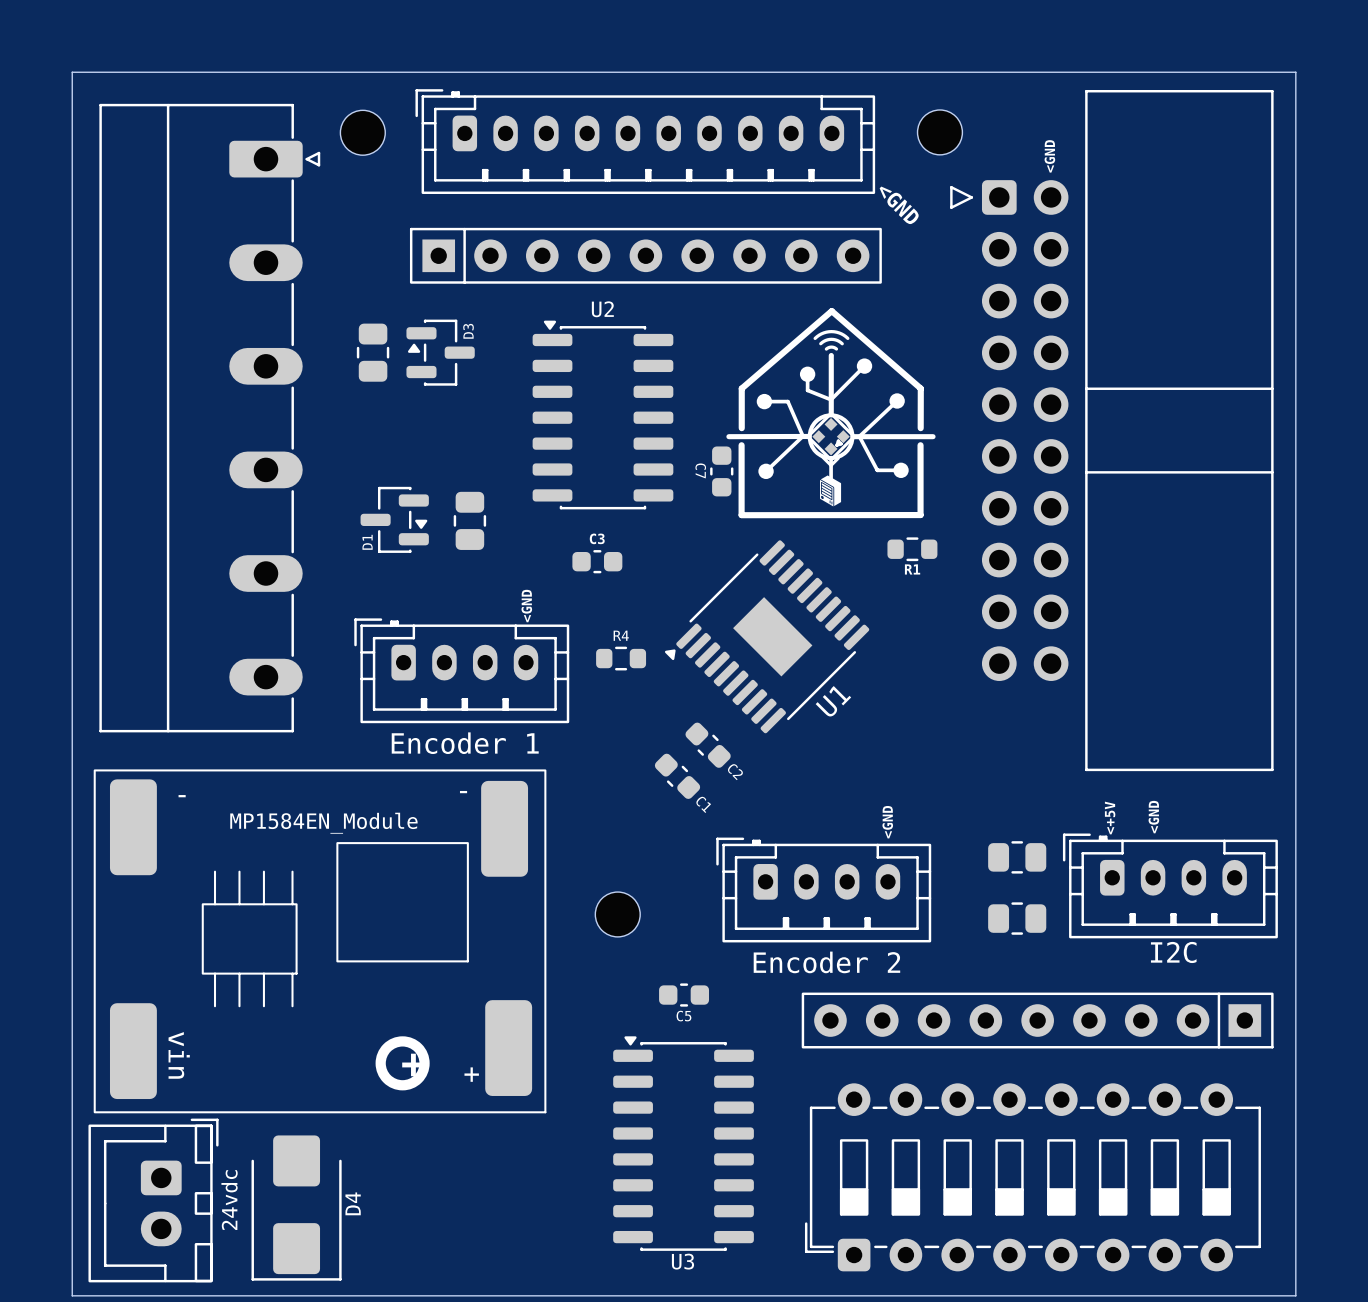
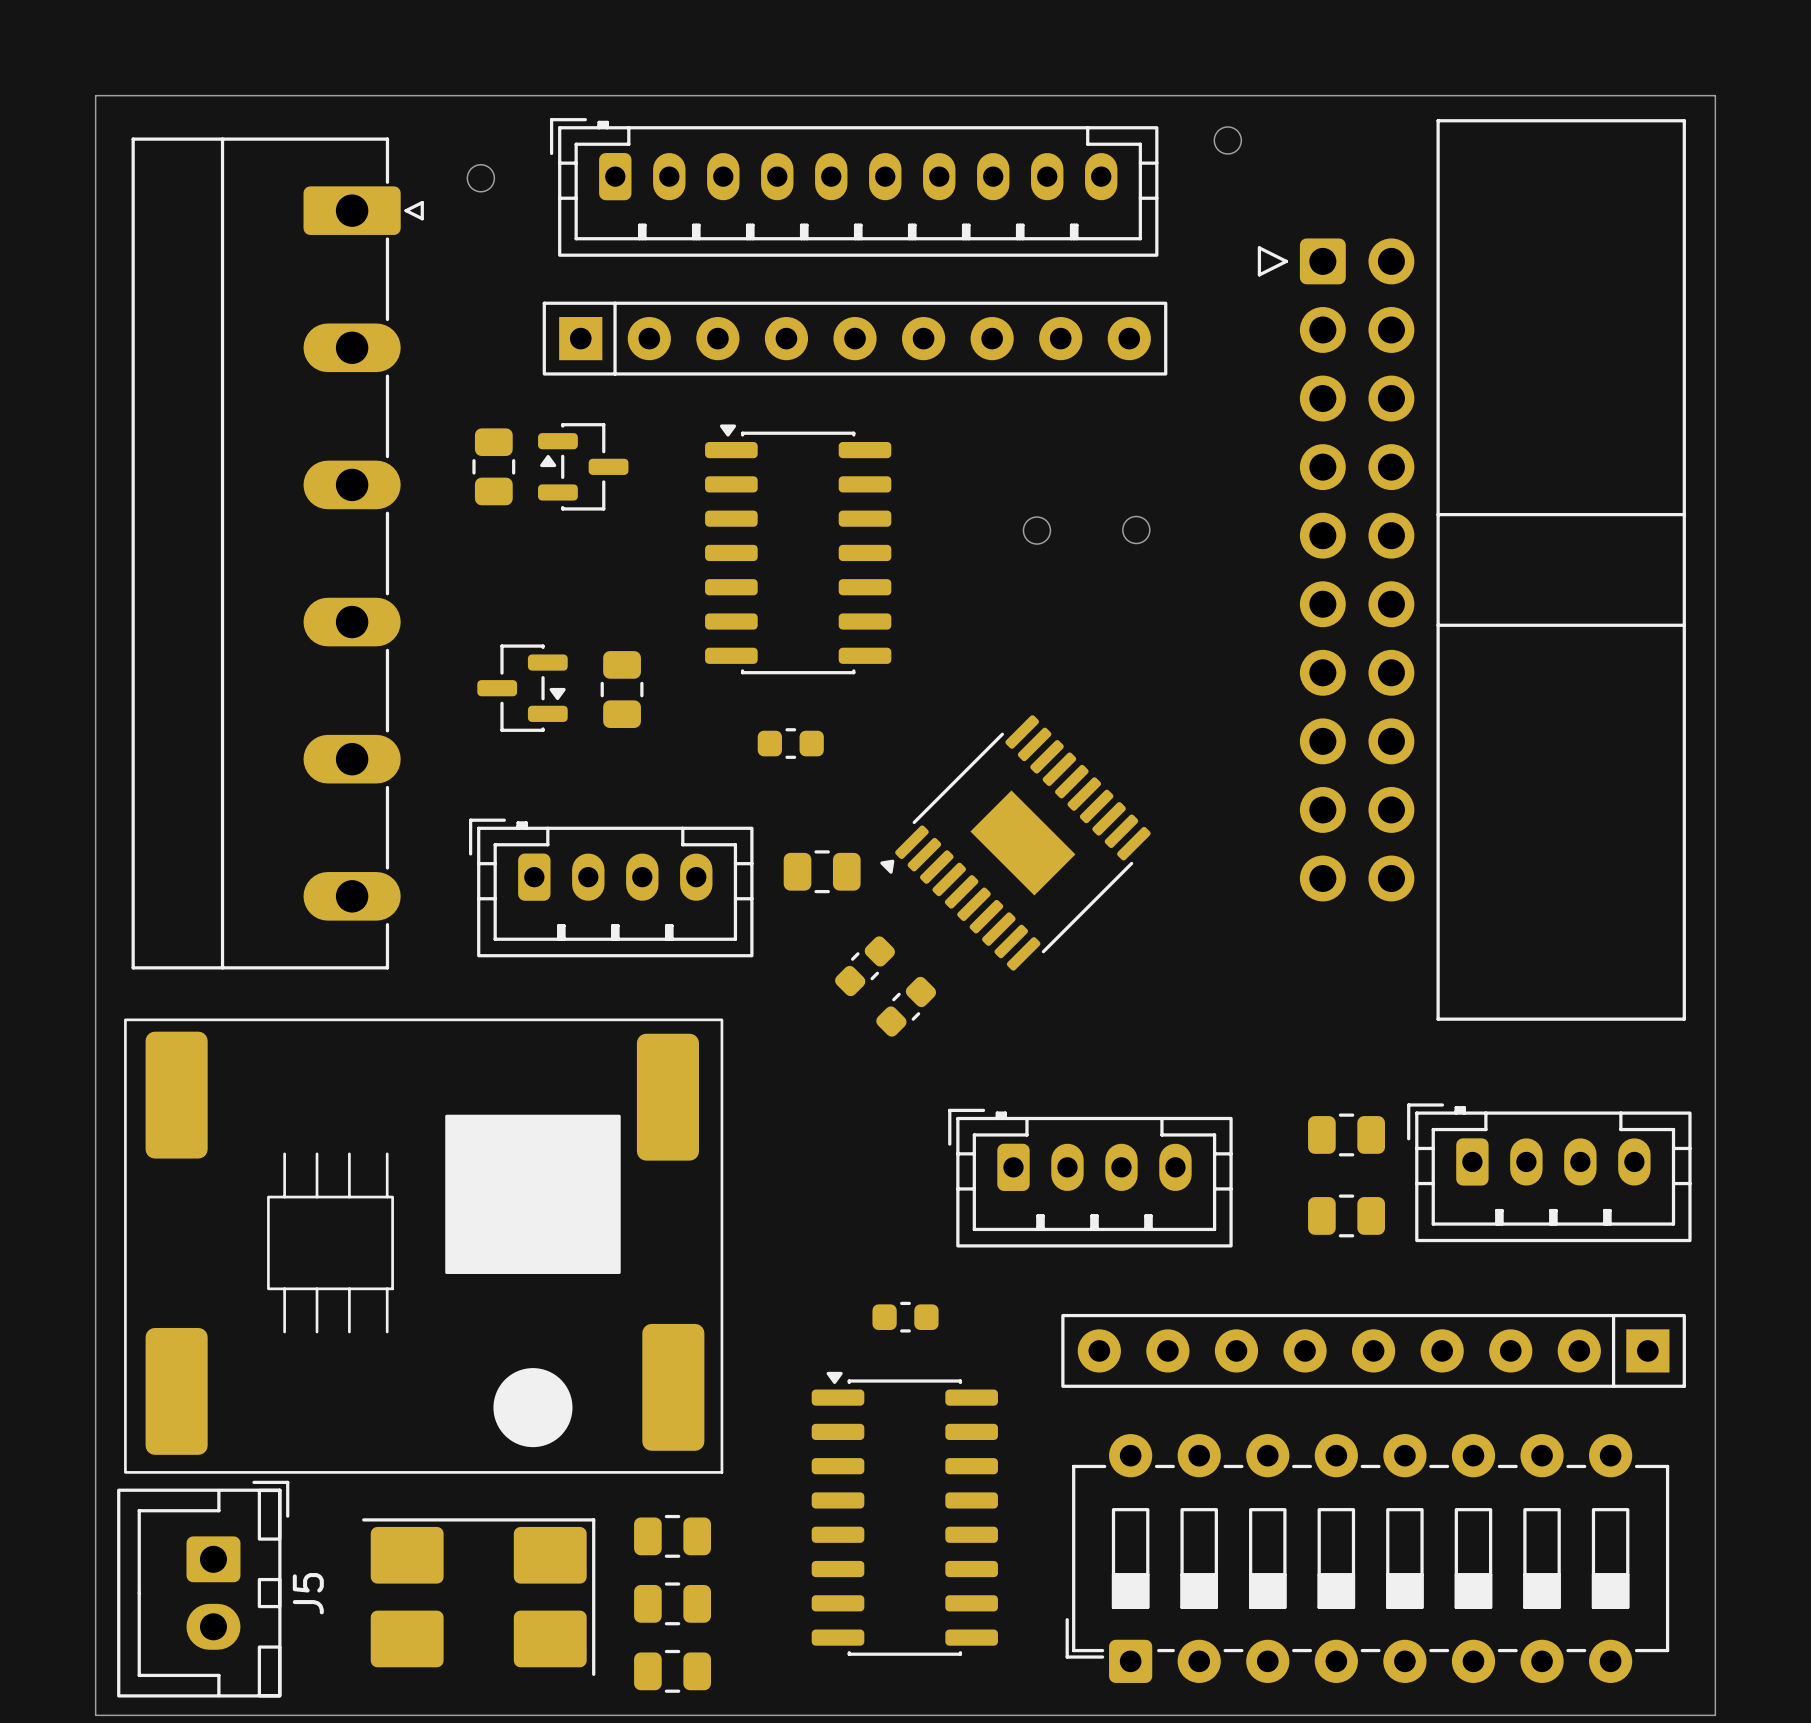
round board edge: none -> [1213, 126, 1242, 155]
round board edge: none -> [466, 164, 496, 193]
part: (362, 132) -> none
part: (939, 132) -> none
text: <GND (1049, 156) -> none
text: <GND (899, 205) -> none
drawing: [726, 308, 936, 519] -> none
U2 name: U2 (602, 309) -> none
D3 name: D3 (468, 331) -> none
round board edge: none -> [1122, 515, 1151, 545]
round board edge: none -> [1022, 516, 1052, 545]
part: (831, 439) -> none
C7: (721, 471) -> none
C3 name: C3 (597, 538) -> none
D1 name: D1 (367, 542) -> none
R1: (912, 549) -> none
text: <GND (526, 606) -> none
R4: (621, 658) -> none
part: none -> (822, 871)
U1 name: U1 (833, 701) -> none
part: none -> (865, 966)
part value: Encoder 1 (465, 743) -> none
C2: (708, 745) -> none
part: none -> (906, 1006)
part footprint: [93, 769, 547, 1114] -> [124, 1018, 724, 1474]
C1: (677, 776) -> none
text: <GND (1153, 817) -> none
text: <+5V (1110, 818) -> none
text: <GND (887, 822) -> none
part value: MP1584EN_Module (323, 823) -> none
part: (617, 914) -> none
part value: I2C (1173, 952) -> none
part value: Encoder 2 (826, 962) -> none
C5 name: C5 (683, 1016) -> none
part: none -> (672, 1536)
J5 value: 24vdc (229, 1200) -> none
J5 name: none -> J5 (308, 1593)
part: none -> (478, 1597)
D4: (296, 1208) -> none
part: none -> (672, 1603)
U3 name: U3 (682, 1261) -> none
part: none -> (672, 1671)

